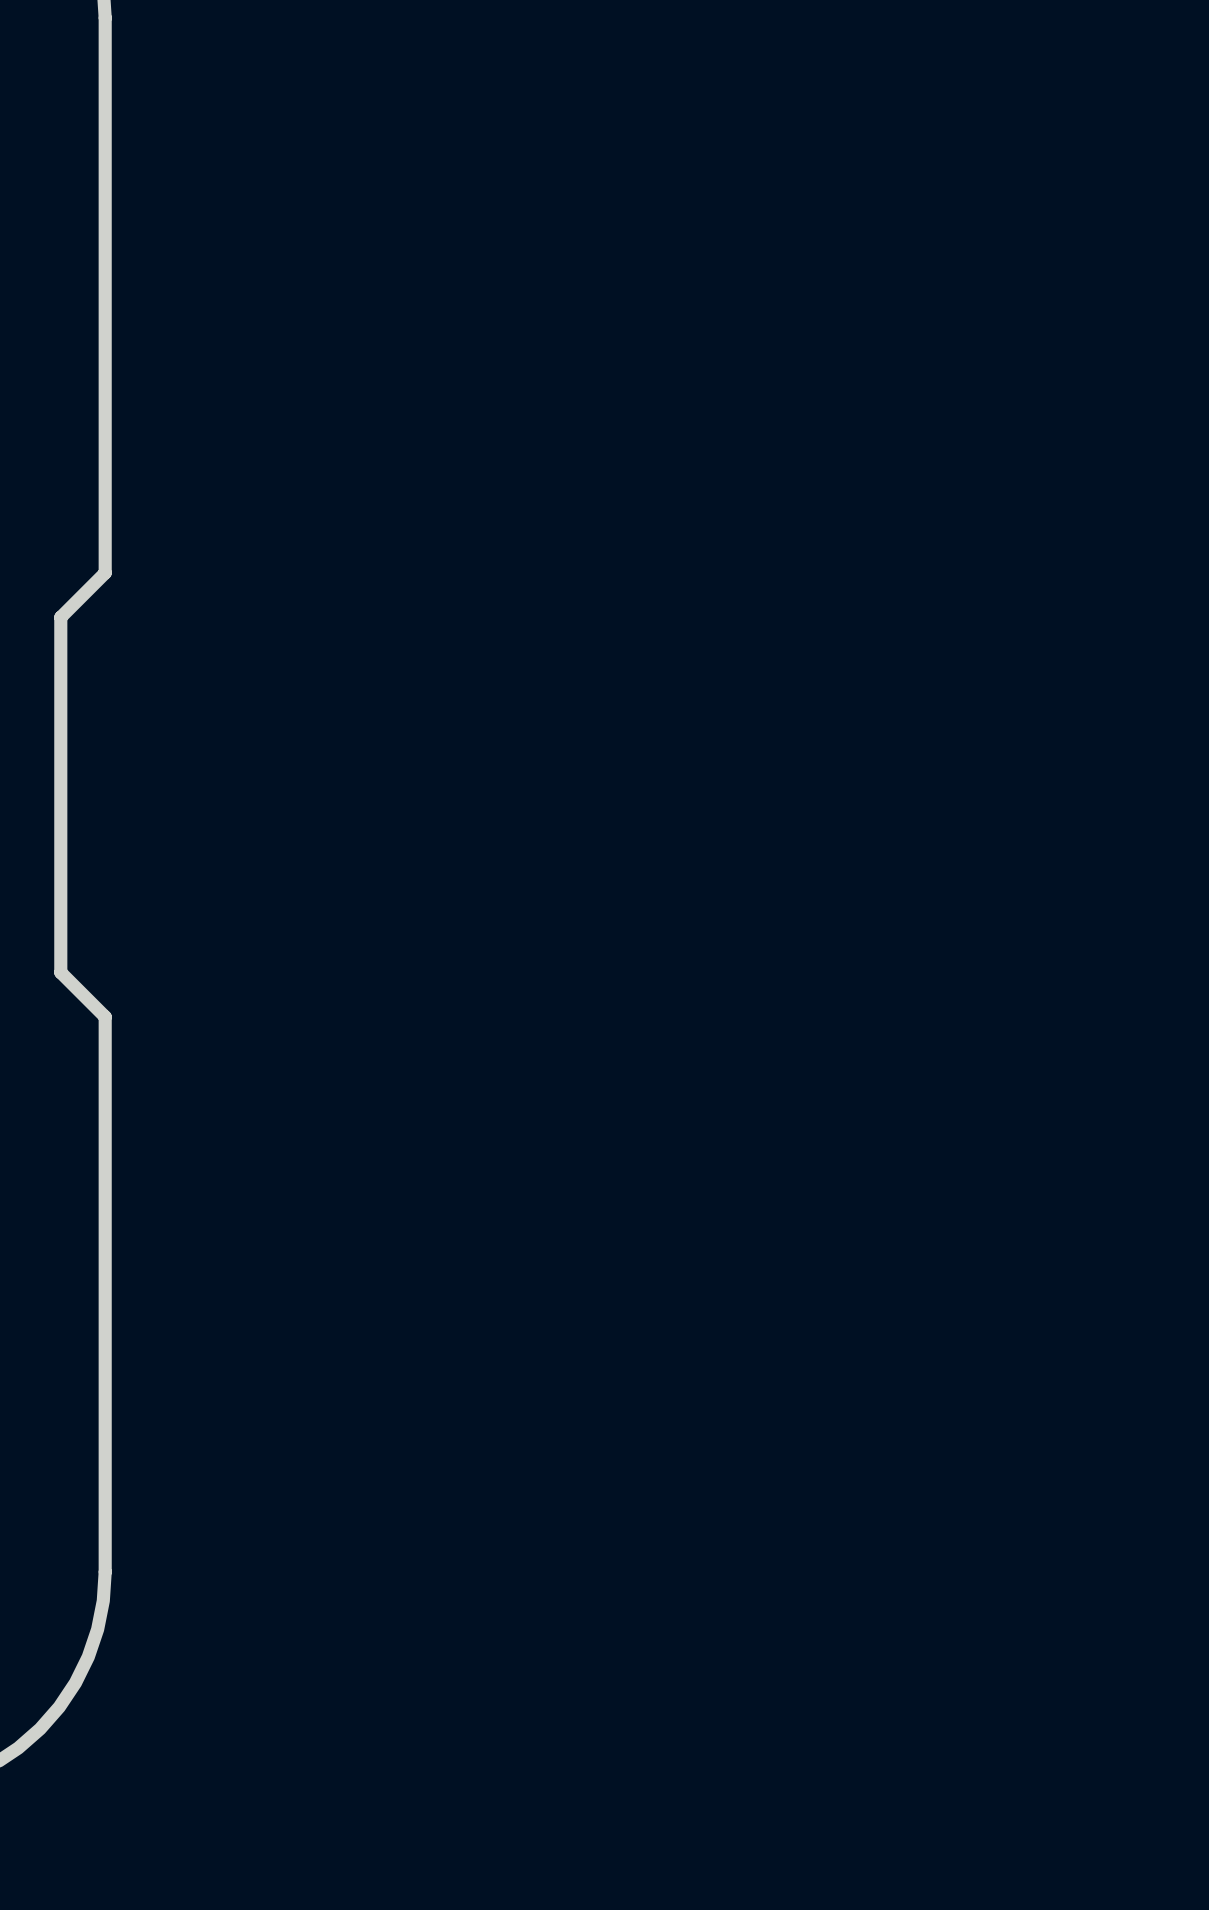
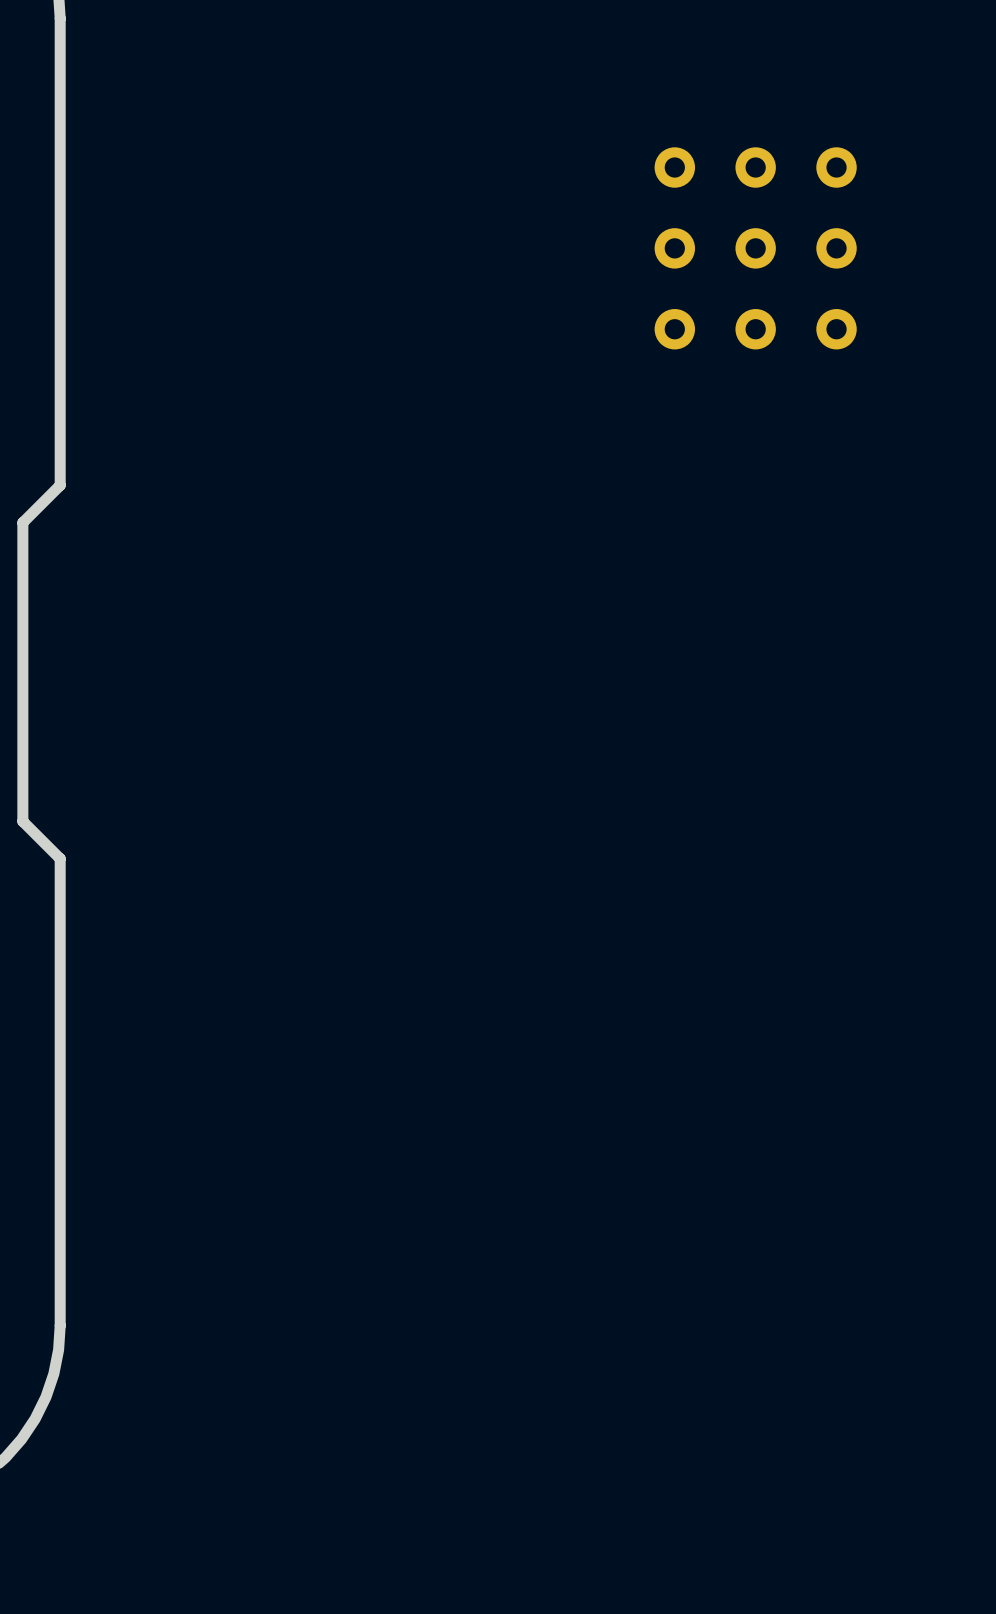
part: none -> (755, 248)

